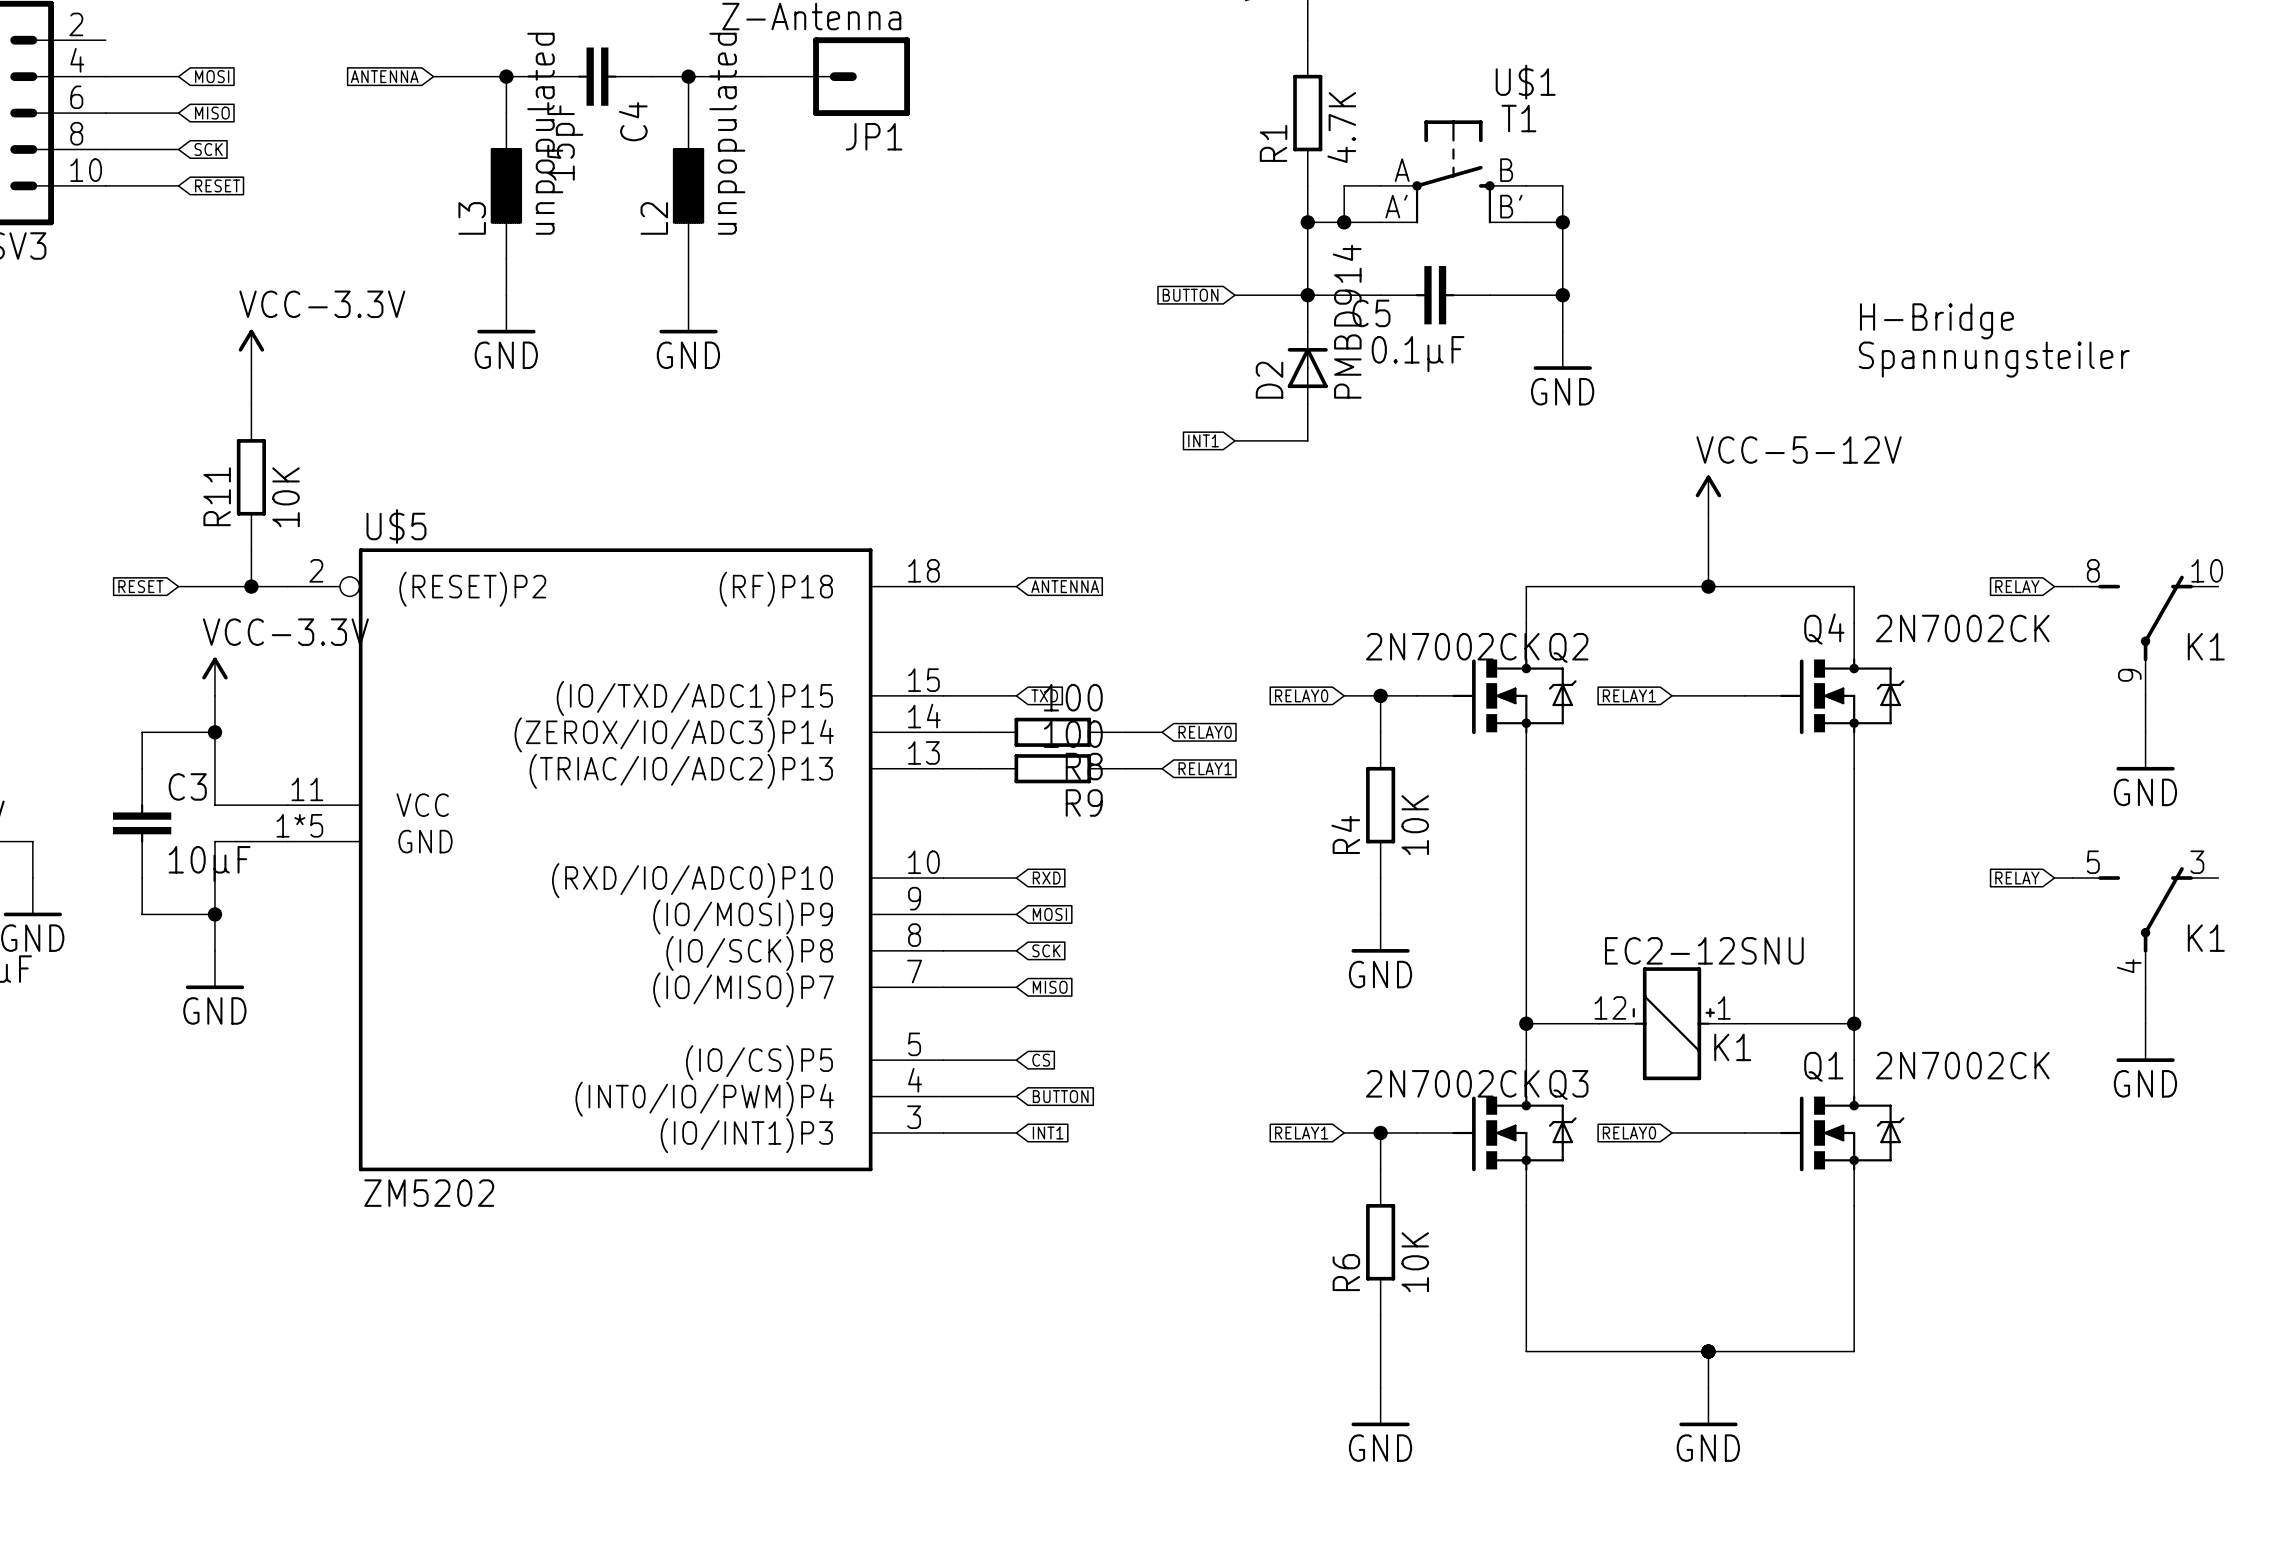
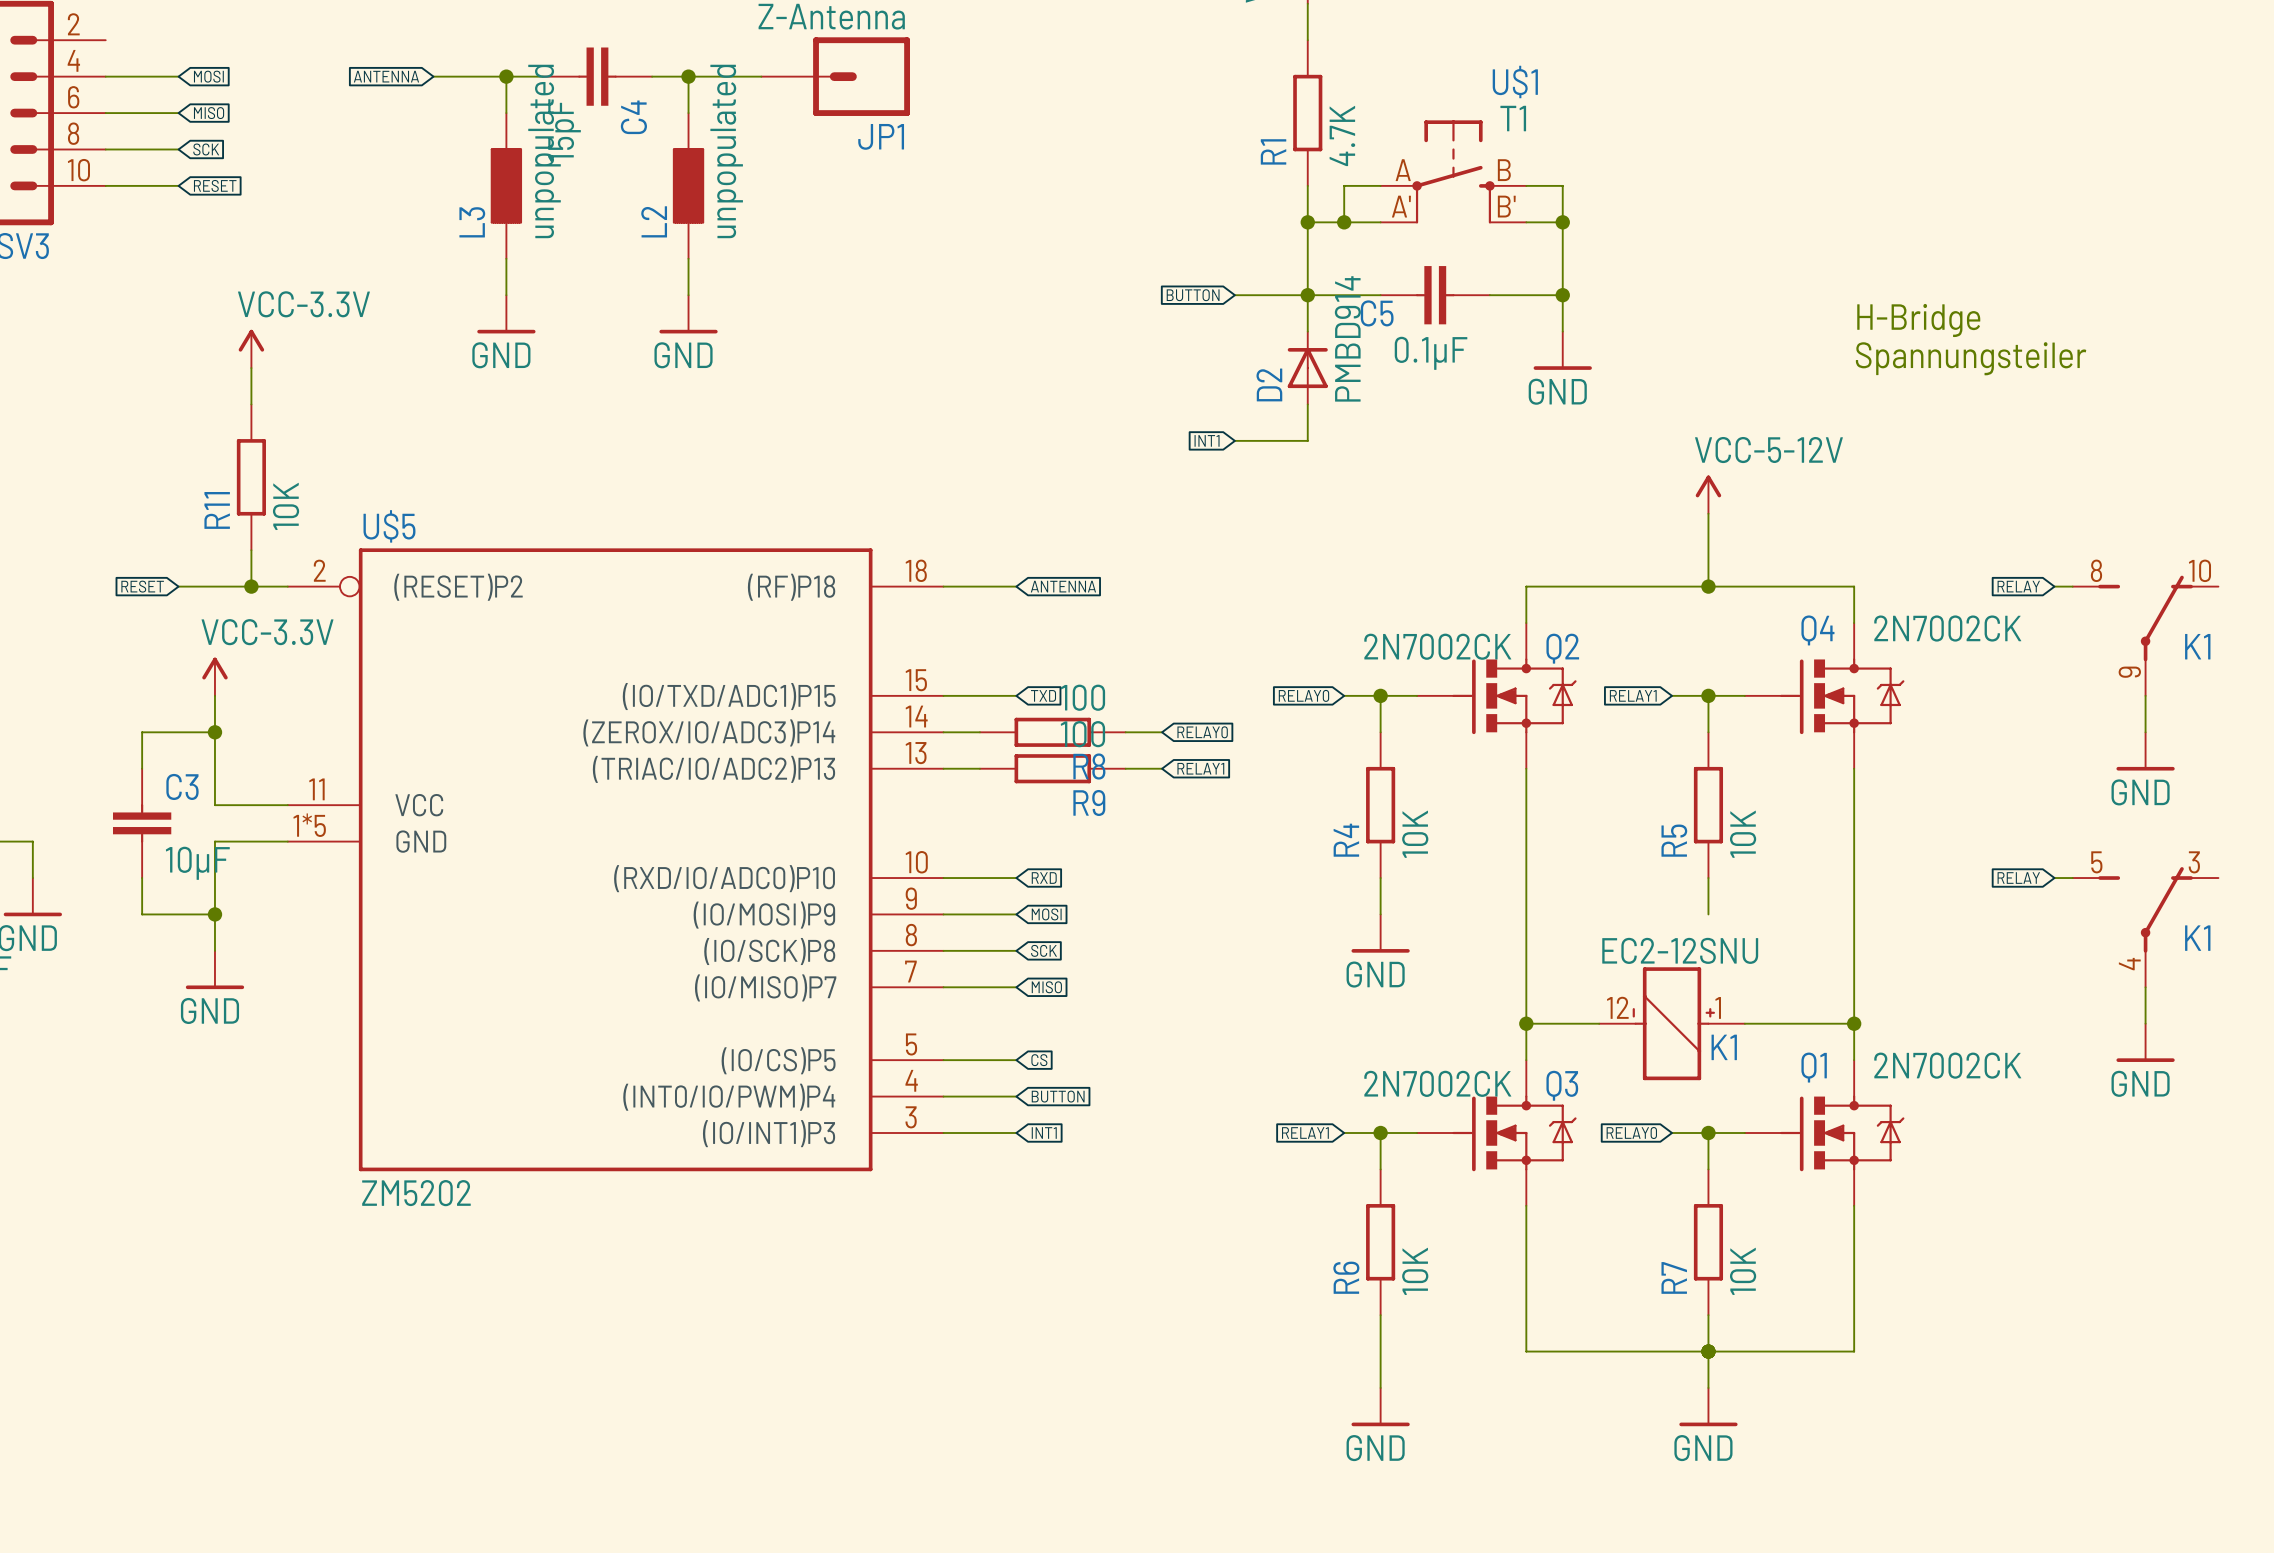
wire: none -> (1708, 695) (1708, 732)
junction: none -> (1708, 695)
R5: none -> 10K (1708, 805)
wire: none -> (1708, 878) (1708, 914)
wire: none -> (1708, 1132) (1708, 1169)
junction: none -> (1708, 1132)
R7: none -> 10K (1708, 1242)
wire: none -> (1708, 1315) (1708, 1351)

